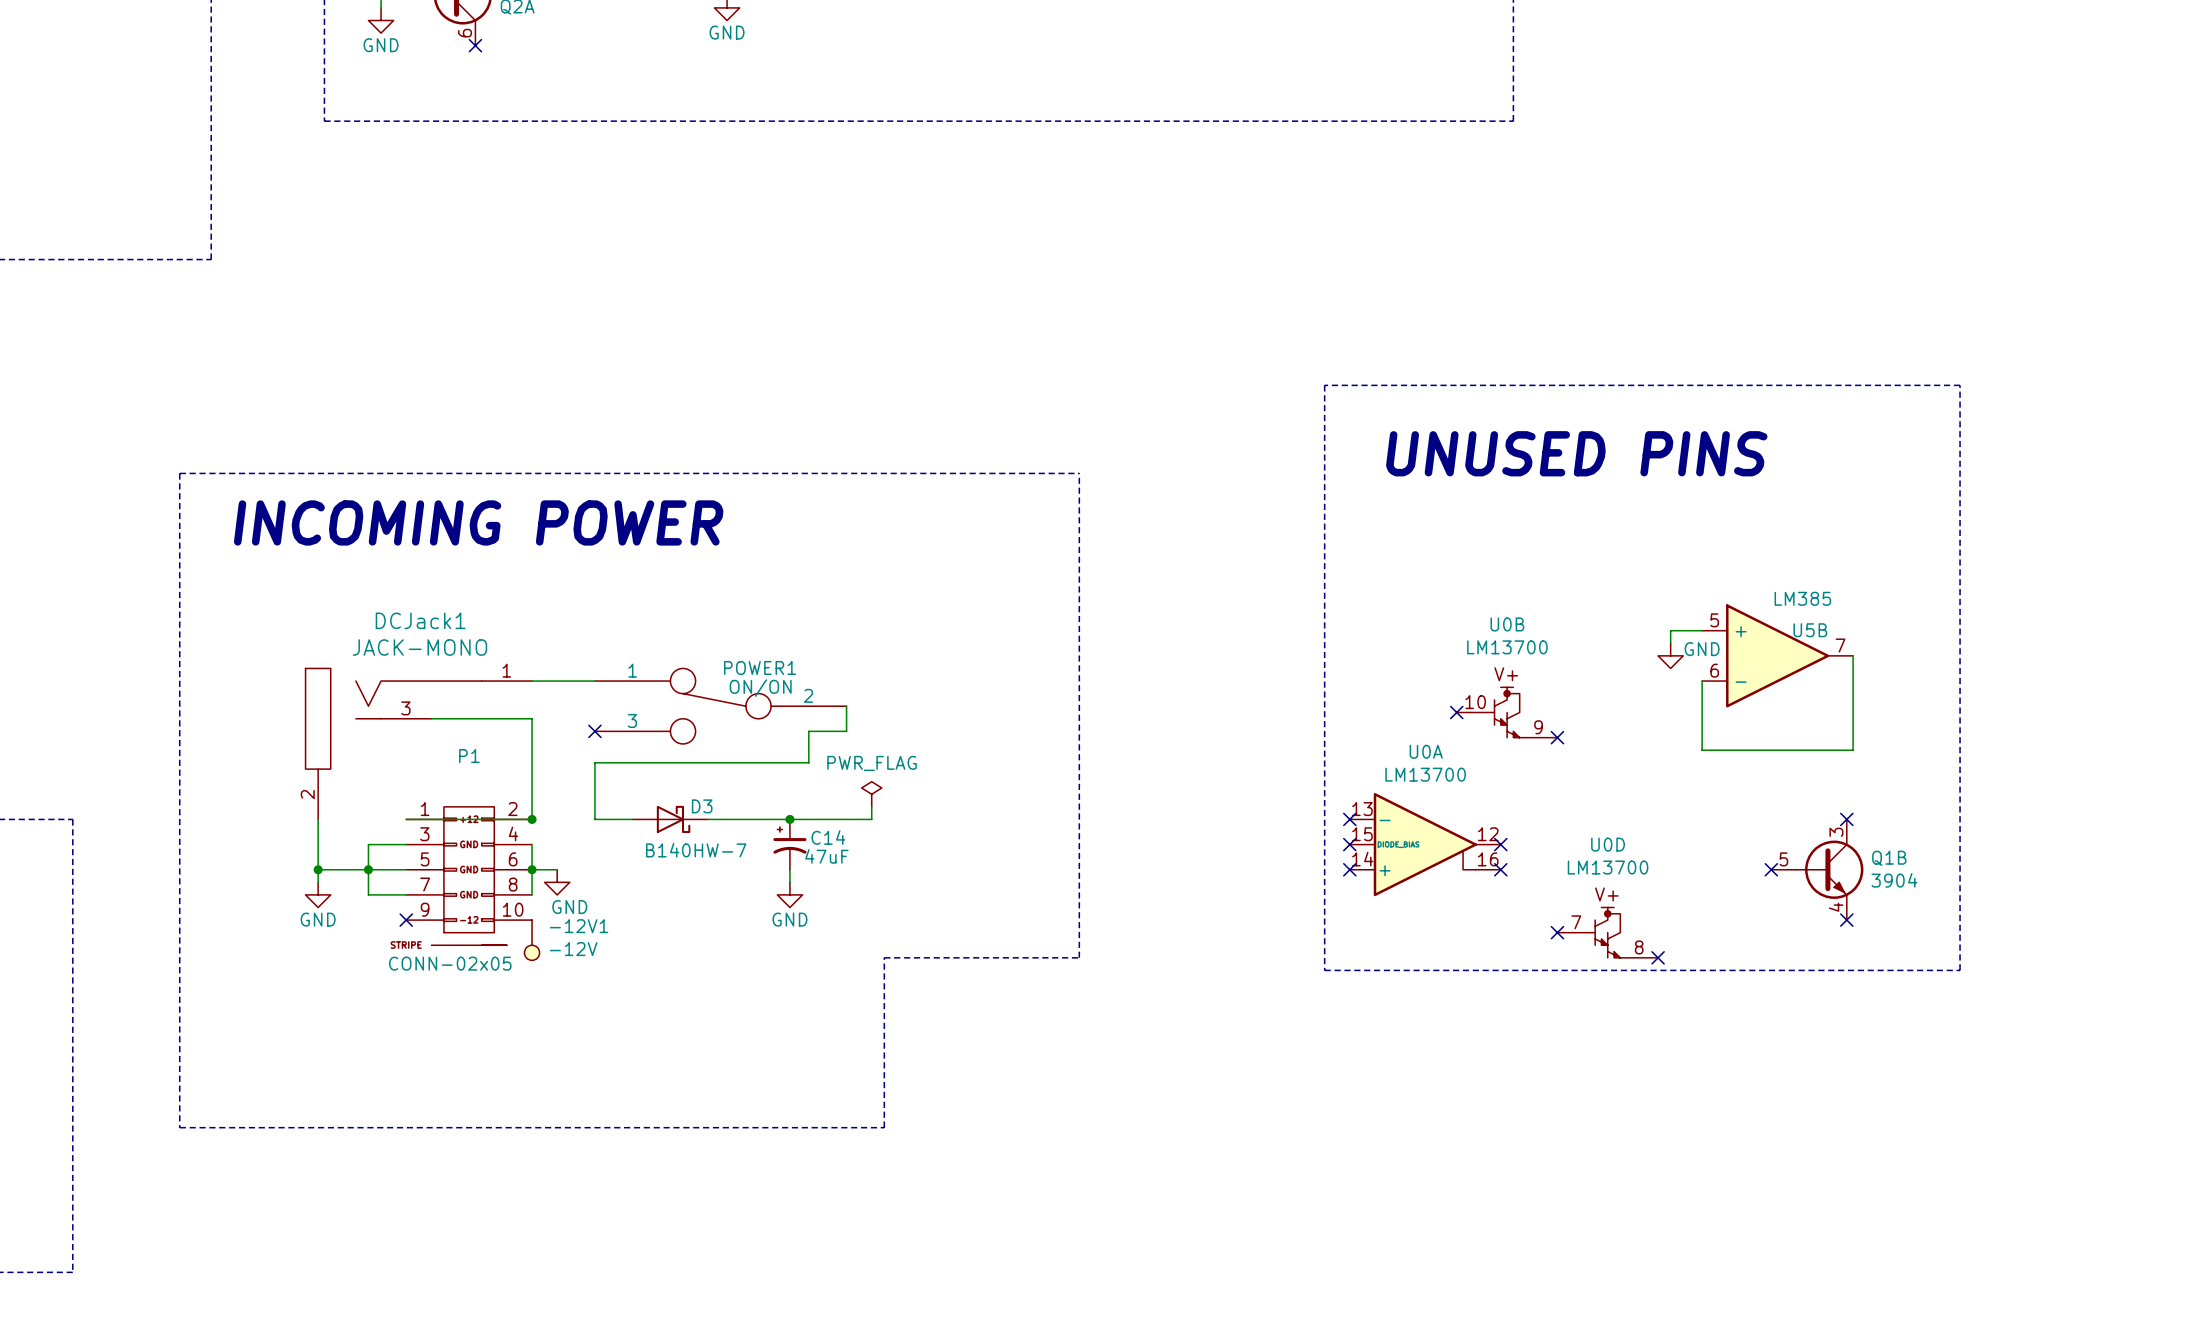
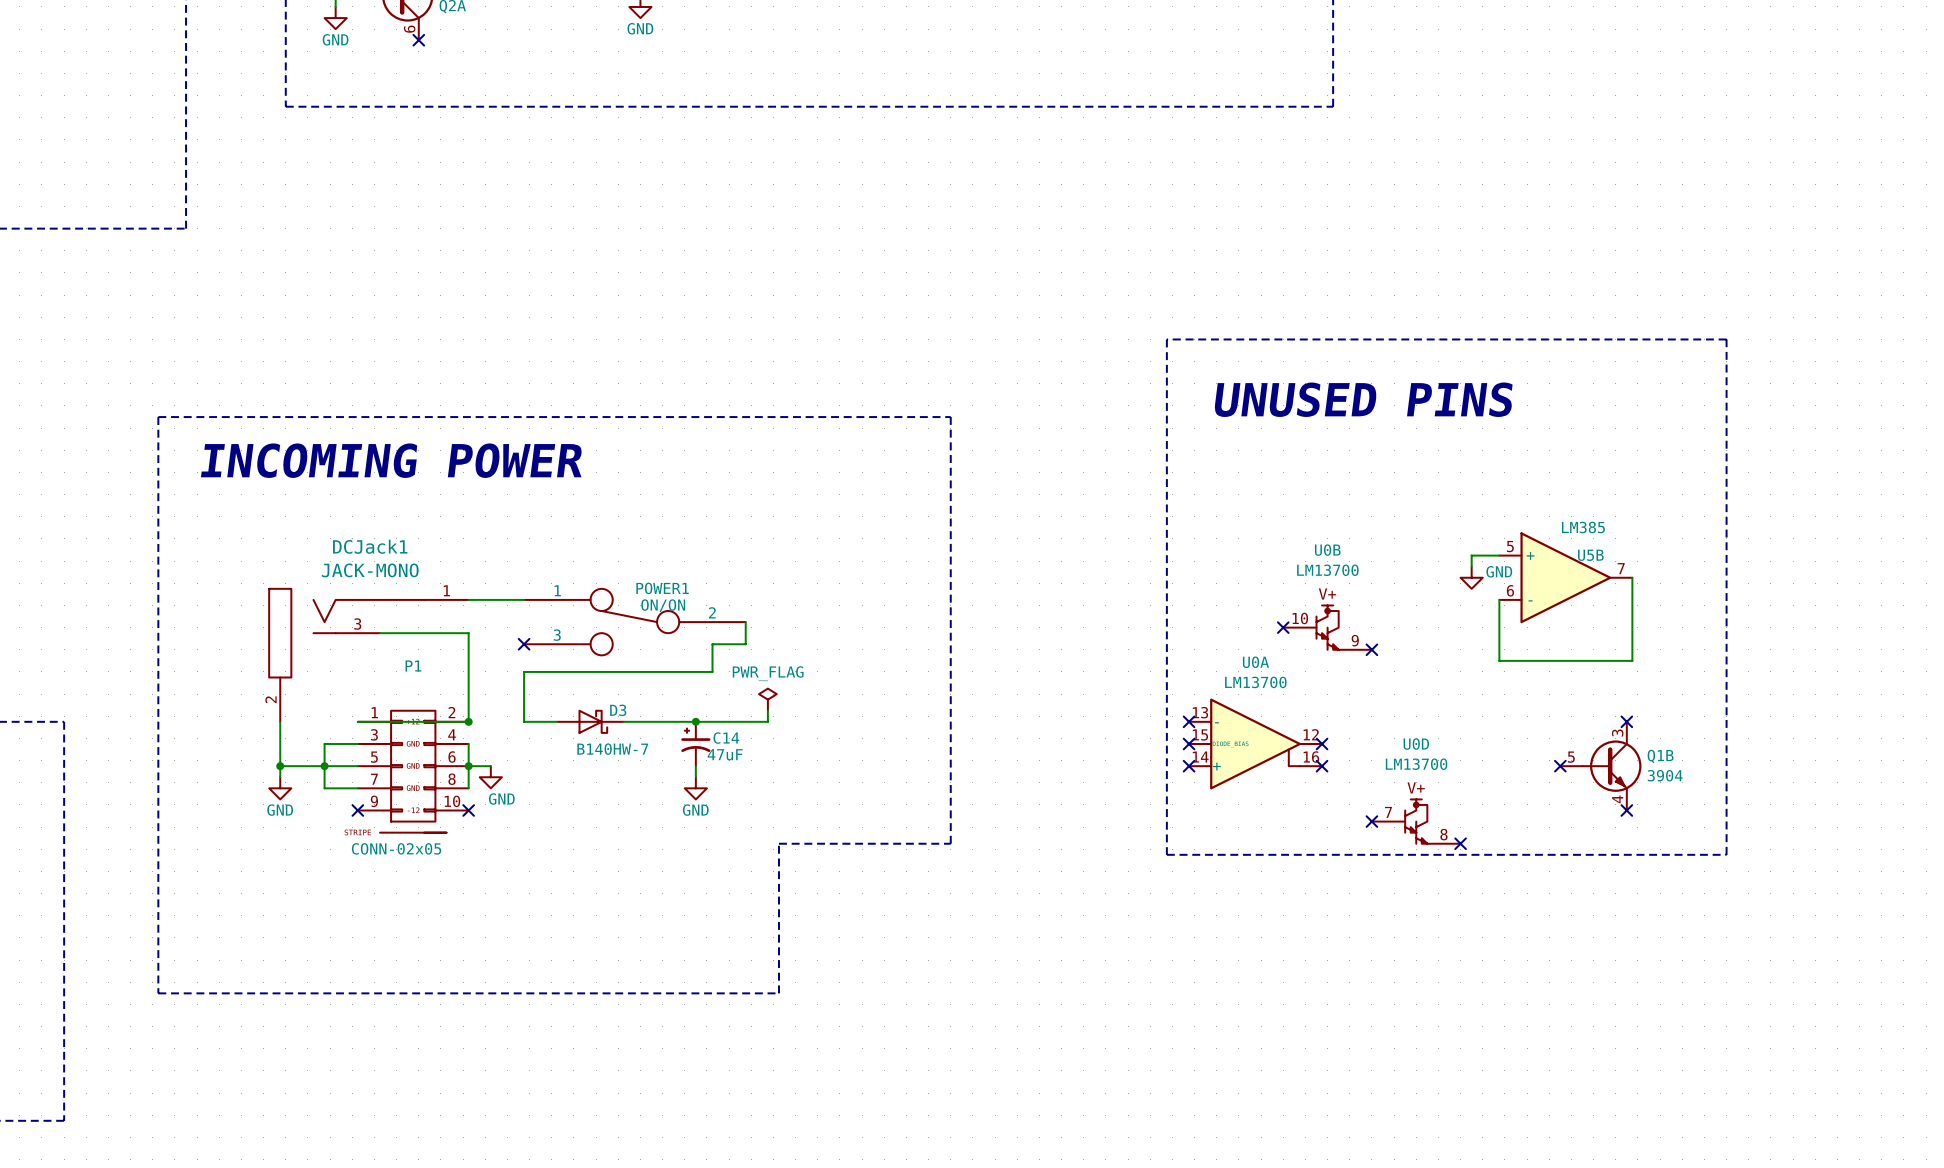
no-connect mark: none -> (468, 810)
-12V1: -12V (532, 940) -> none

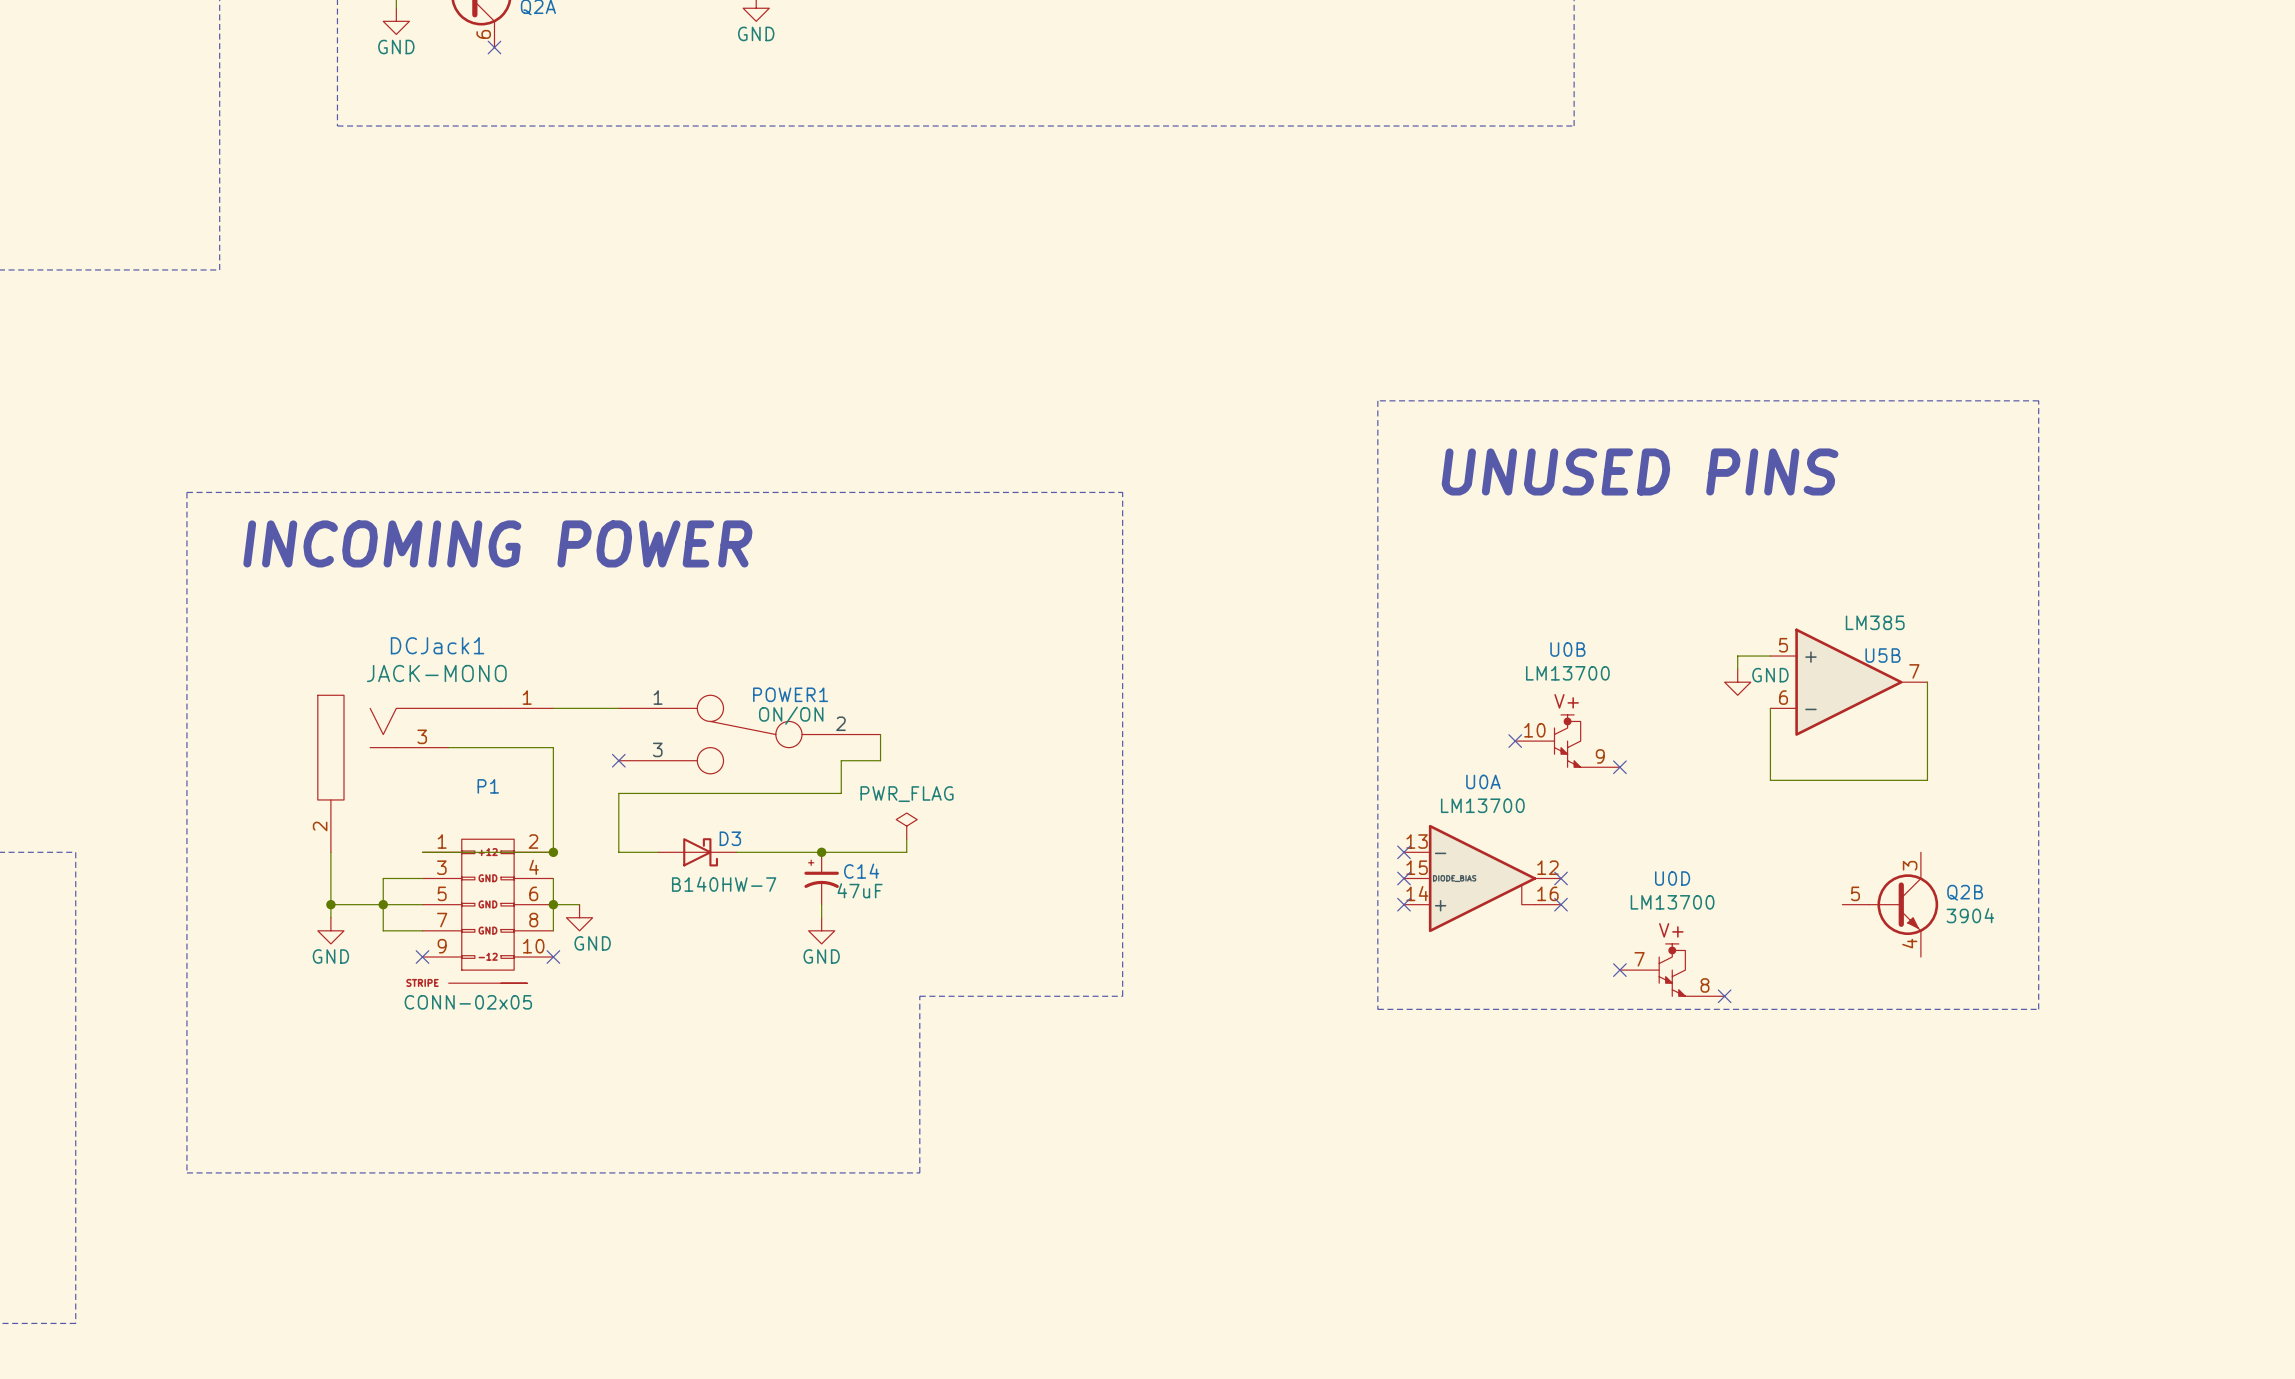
no-connect mark: (1626, 721) -> none
Q1B name: Q1B (1660, 756) -> Q2B (1965, 892)
no-connect mark: (1560, 766) -> none
no-connect mark: (1626, 810) -> none

